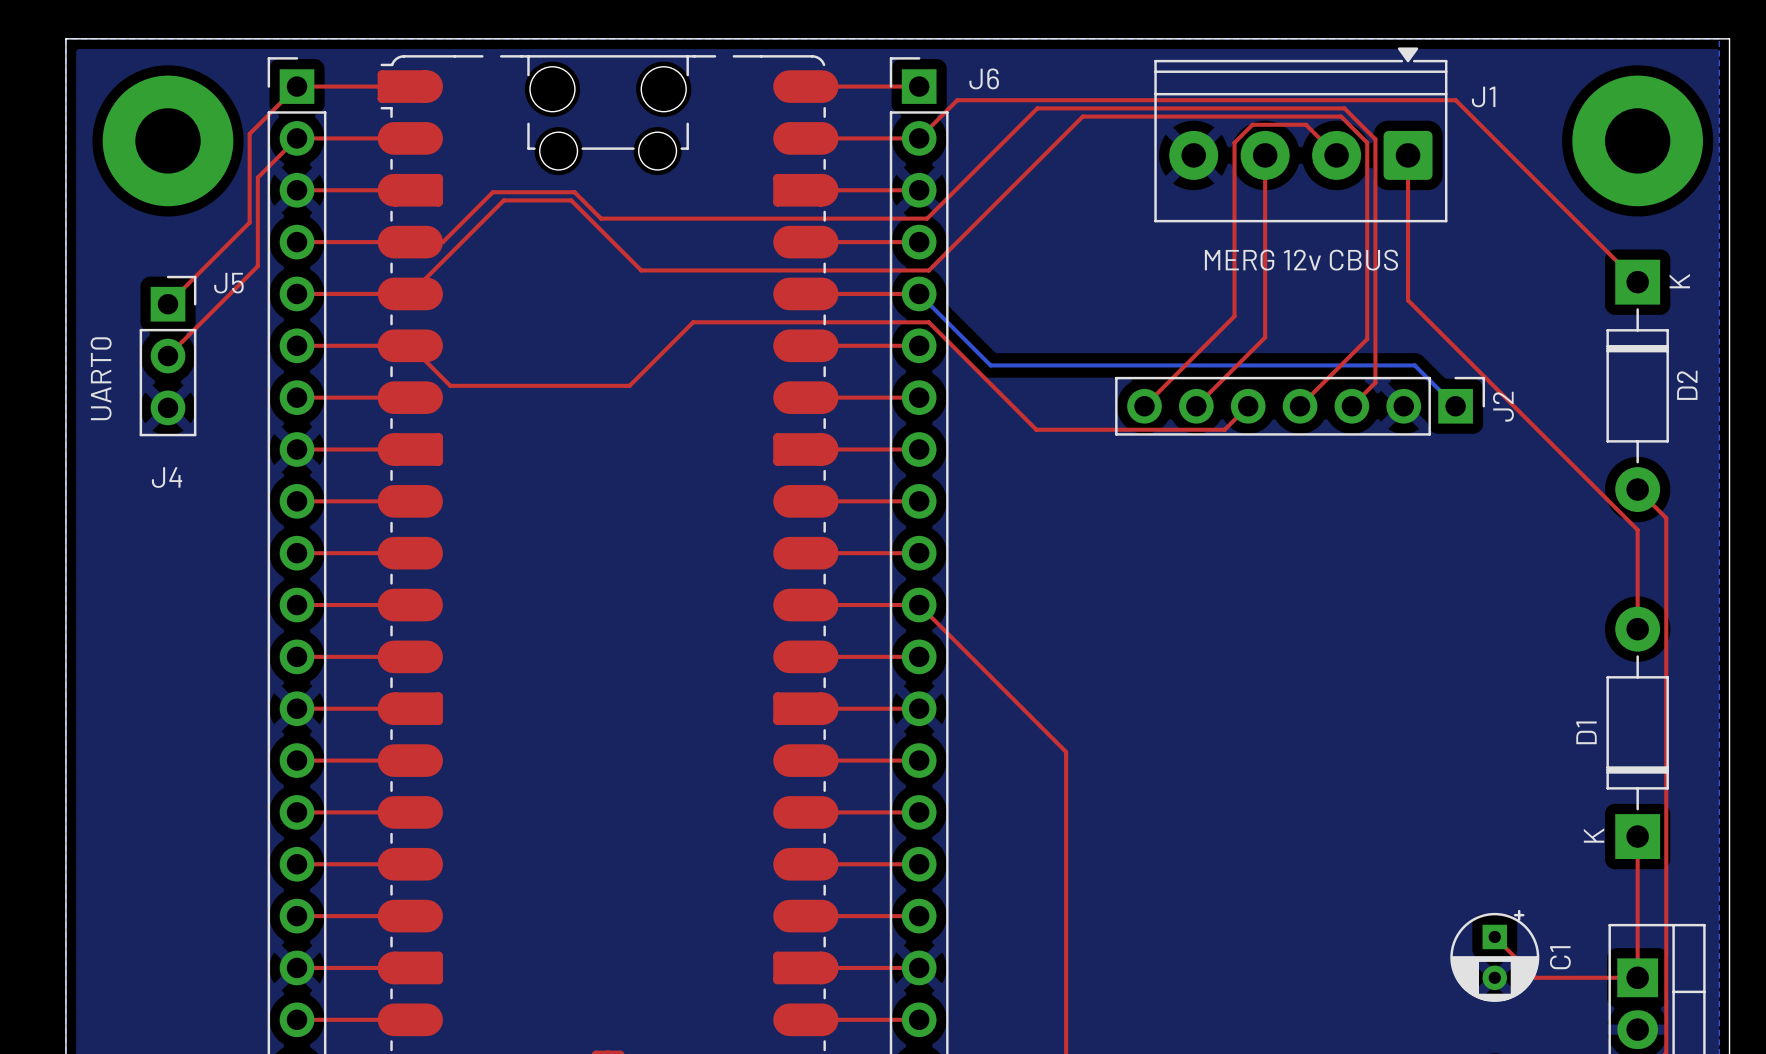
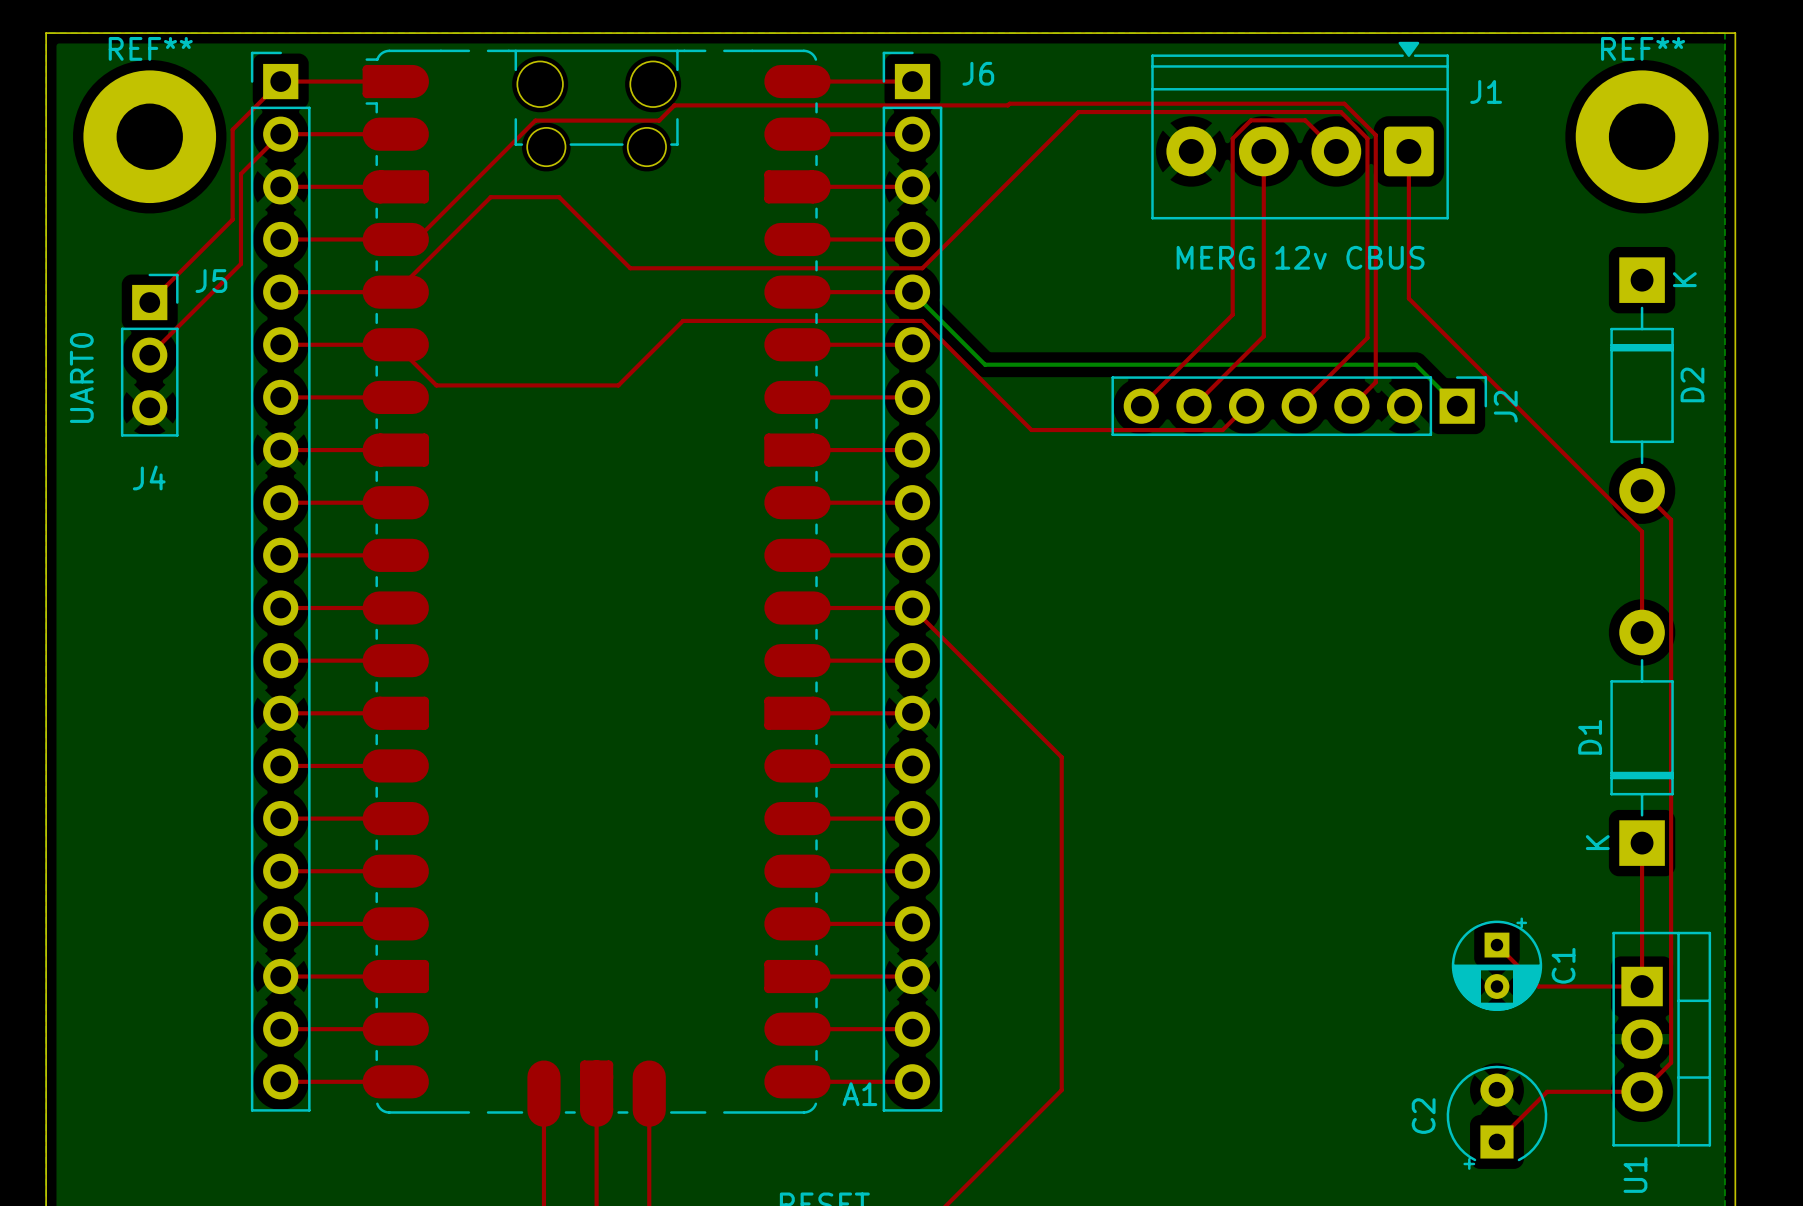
REF** name: none -> REF** (150, 48)
REF** name: none -> REF** (1643, 48)
top track: (1037, 108) (927, 218) (601, 218) (574, 192) (492, 192) (442, 242) (430, 242) -> (1032, 103) (1009, 103) (1007, 105) (674, 105) (659, 120) (535, 120) (416, 239)
top track: (919, 138) (957, 100) (1455, 100) (1637, 282) -> none

